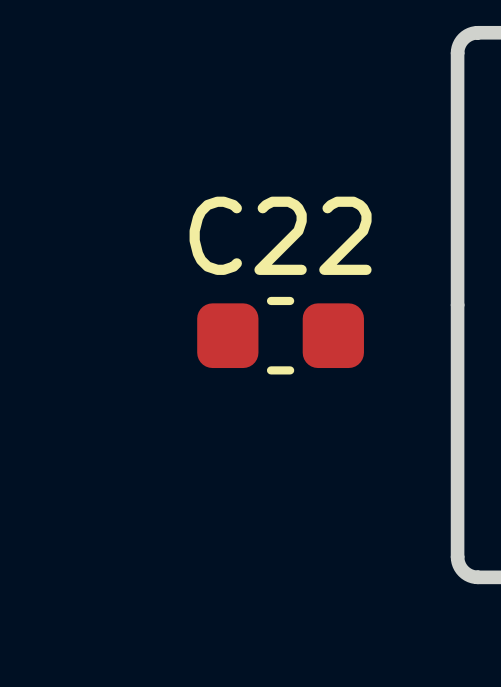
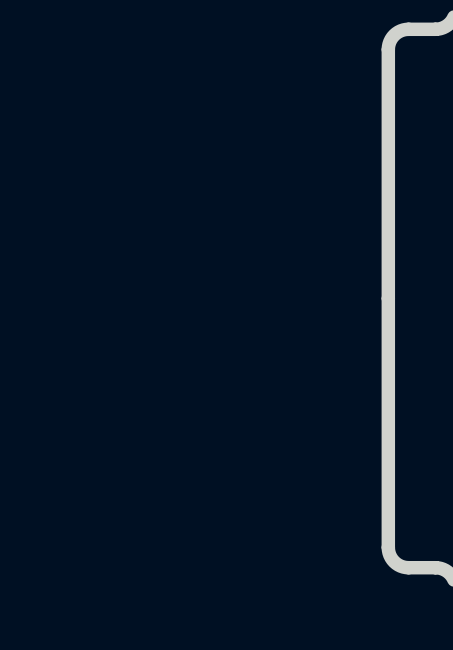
C22: (280, 335) -> none

